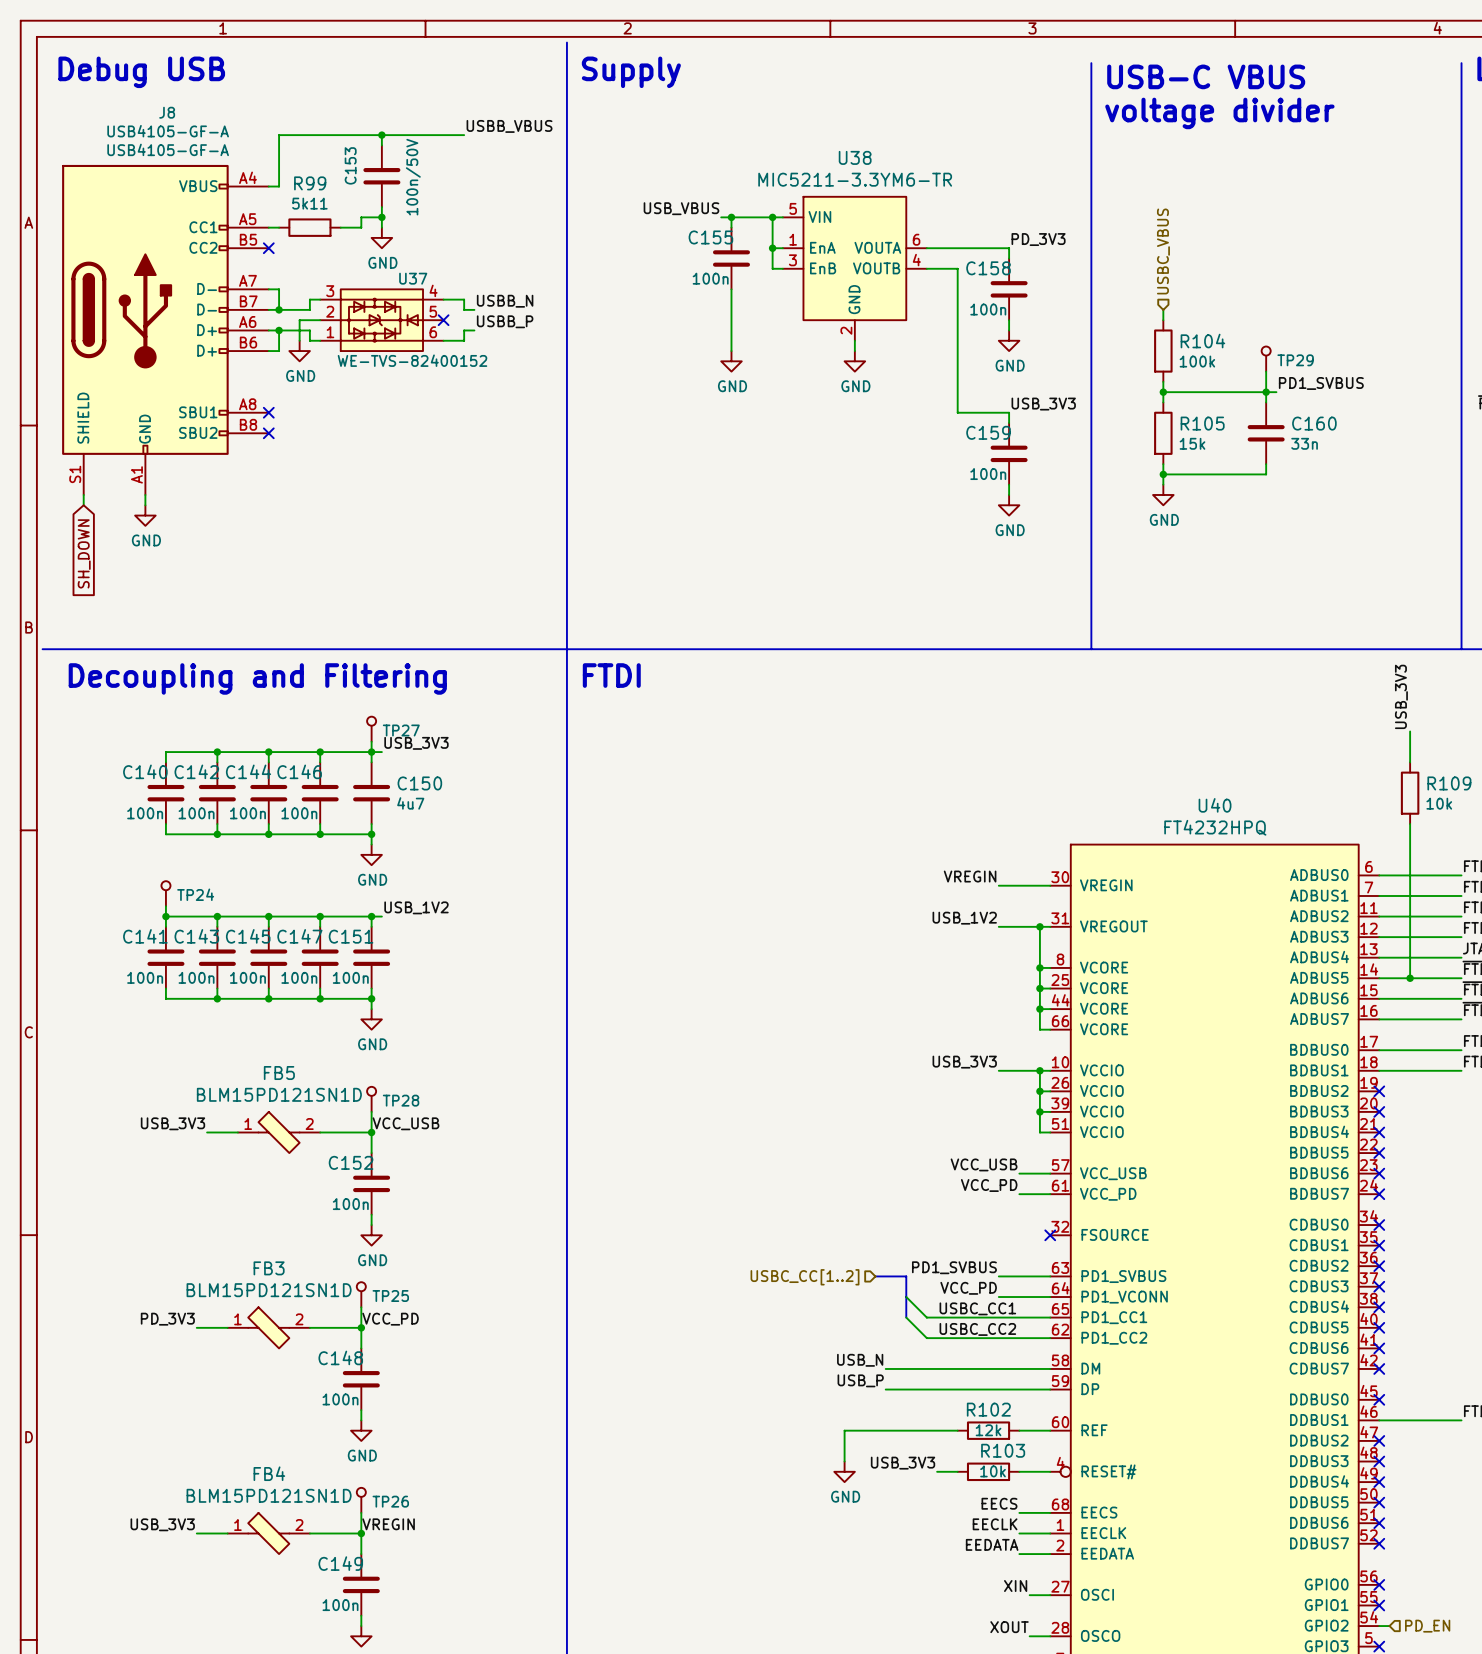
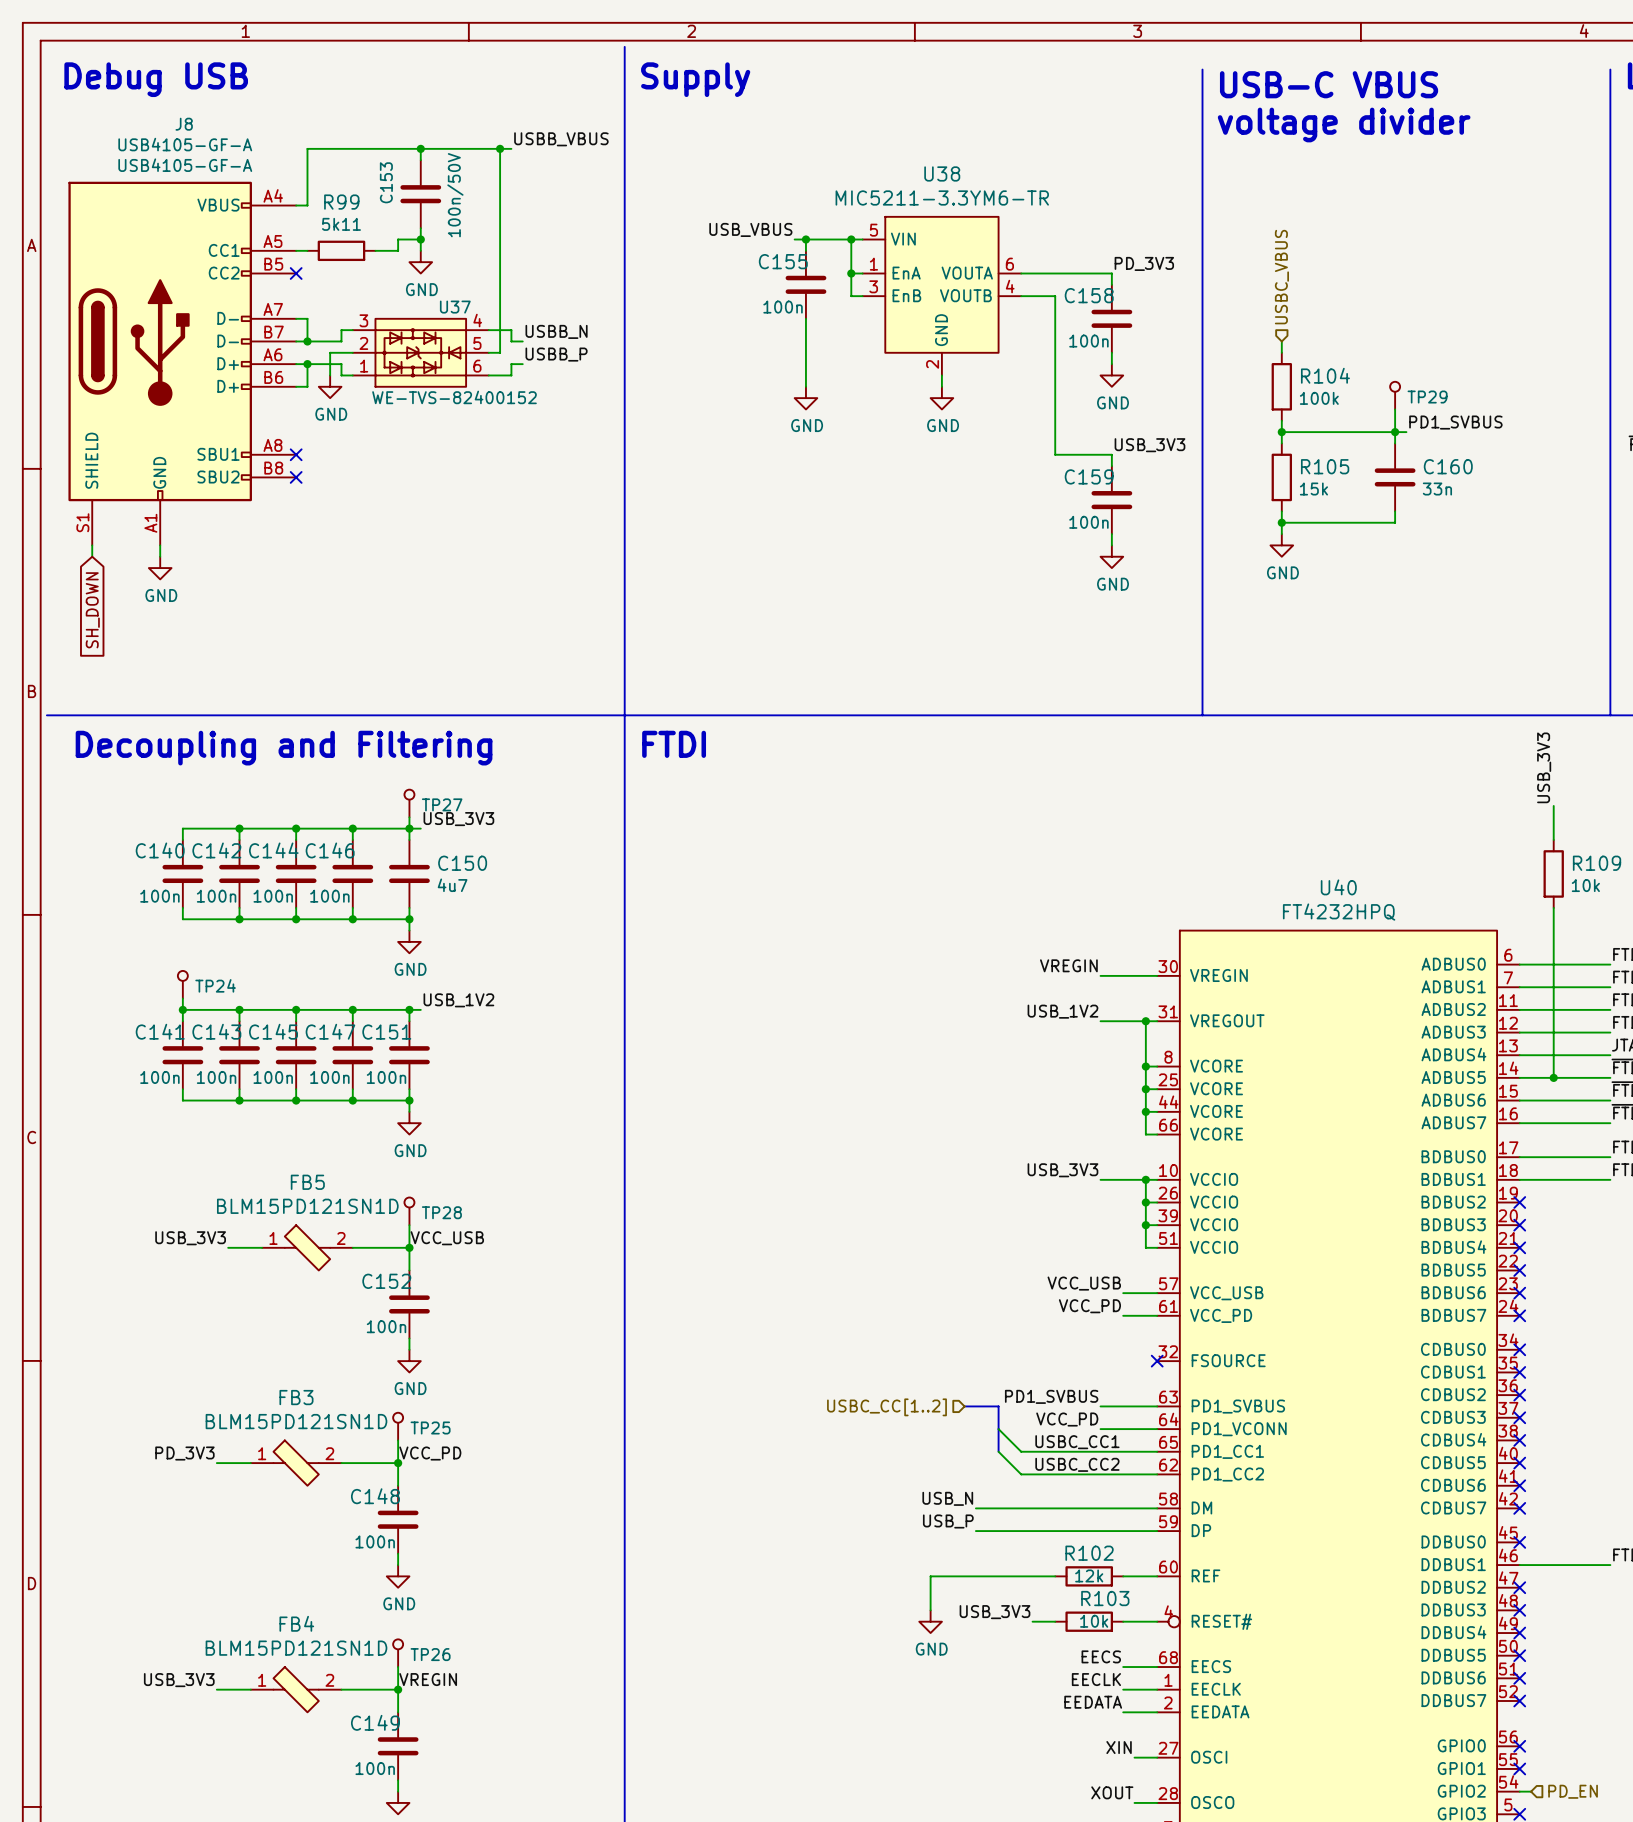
wire: none -> (500, 148) (500, 352) (488, 352)
junction: none -> (500, 148)
no-connect mark: (443, 320) -> none

